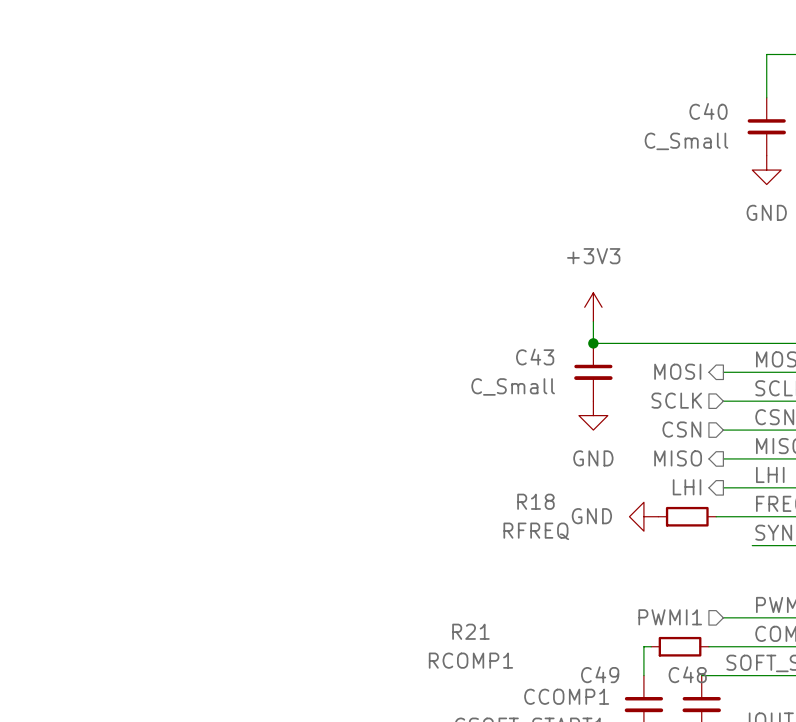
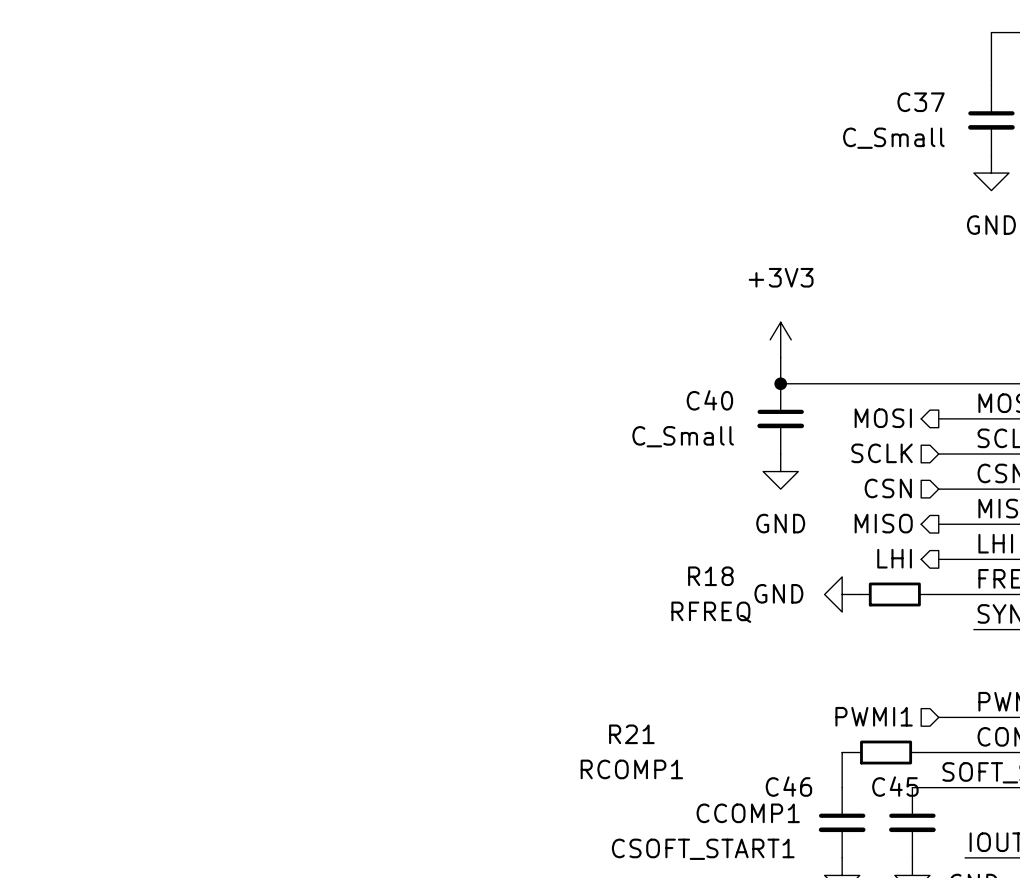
C40 name: C40 (708, 111) -> C37 (921, 102)
C43 name: C43 (535, 357) -> C40 (709, 400)
C49 name: C49 (600, 674) -> C46 (788, 786)
C48 name: C48 (687, 674) -> C45 (895, 786)

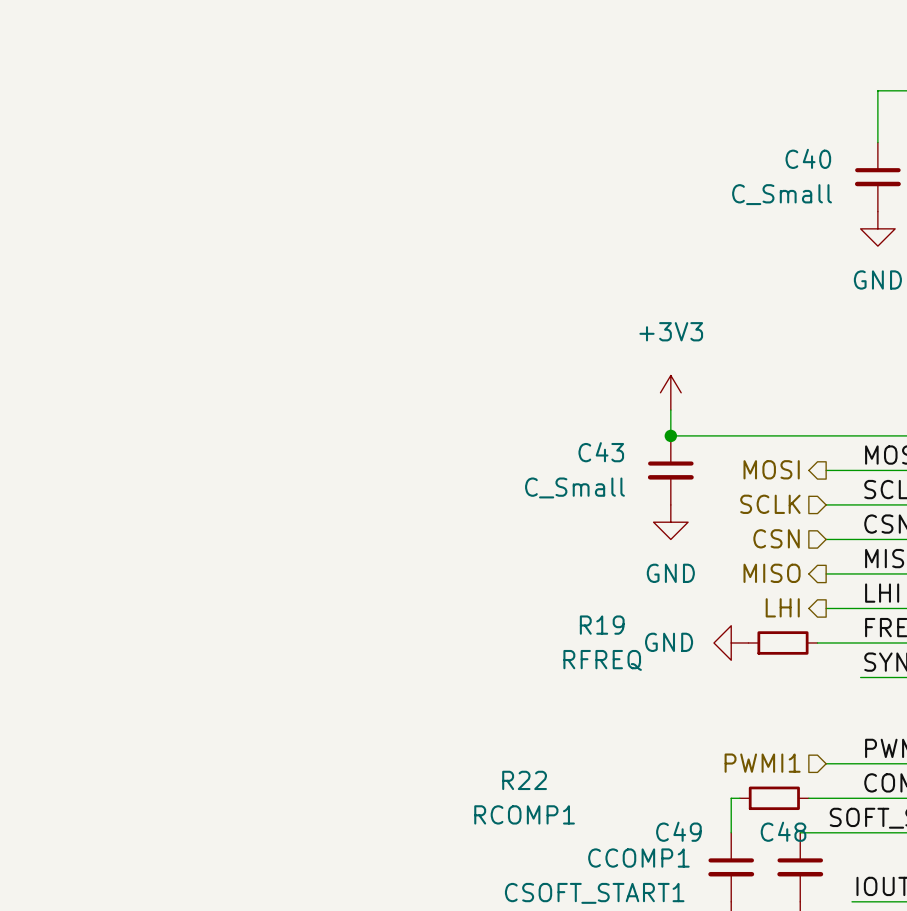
C37 name: C37 (921, 102) -> C40 (808, 158)
C40 name: C40 (709, 400) -> C43 (601, 452)
R18 name: R18 (710, 576) -> R19 (602, 625)
R21 name: R21 (631, 734) -> R22 (524, 780)
C46 name: C46 (788, 786) -> C49 (678, 831)
C45 name: C45 (895, 786) -> C48 (783, 831)

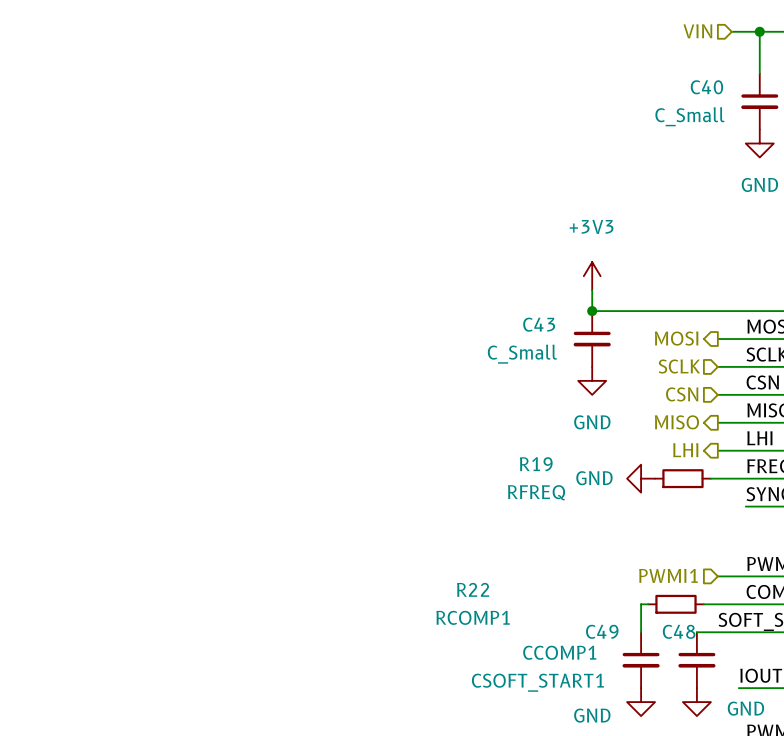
hierarchical label: none -> VIN (697, 31)
wire: none -> (731, 31) (759, 31)
junction: none -> (759, 31)

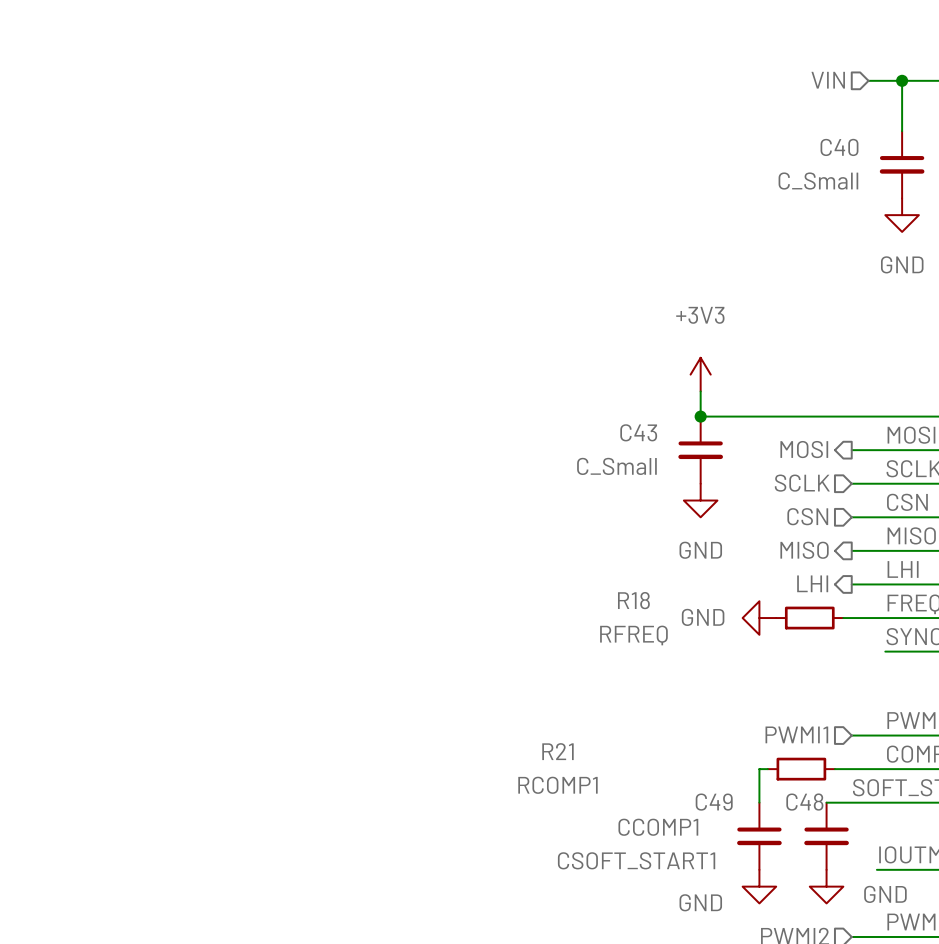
R19 name: R19 (536, 464) -> R18 (633, 600)
R22 name: R22 (473, 589) -> R21 (557, 751)

